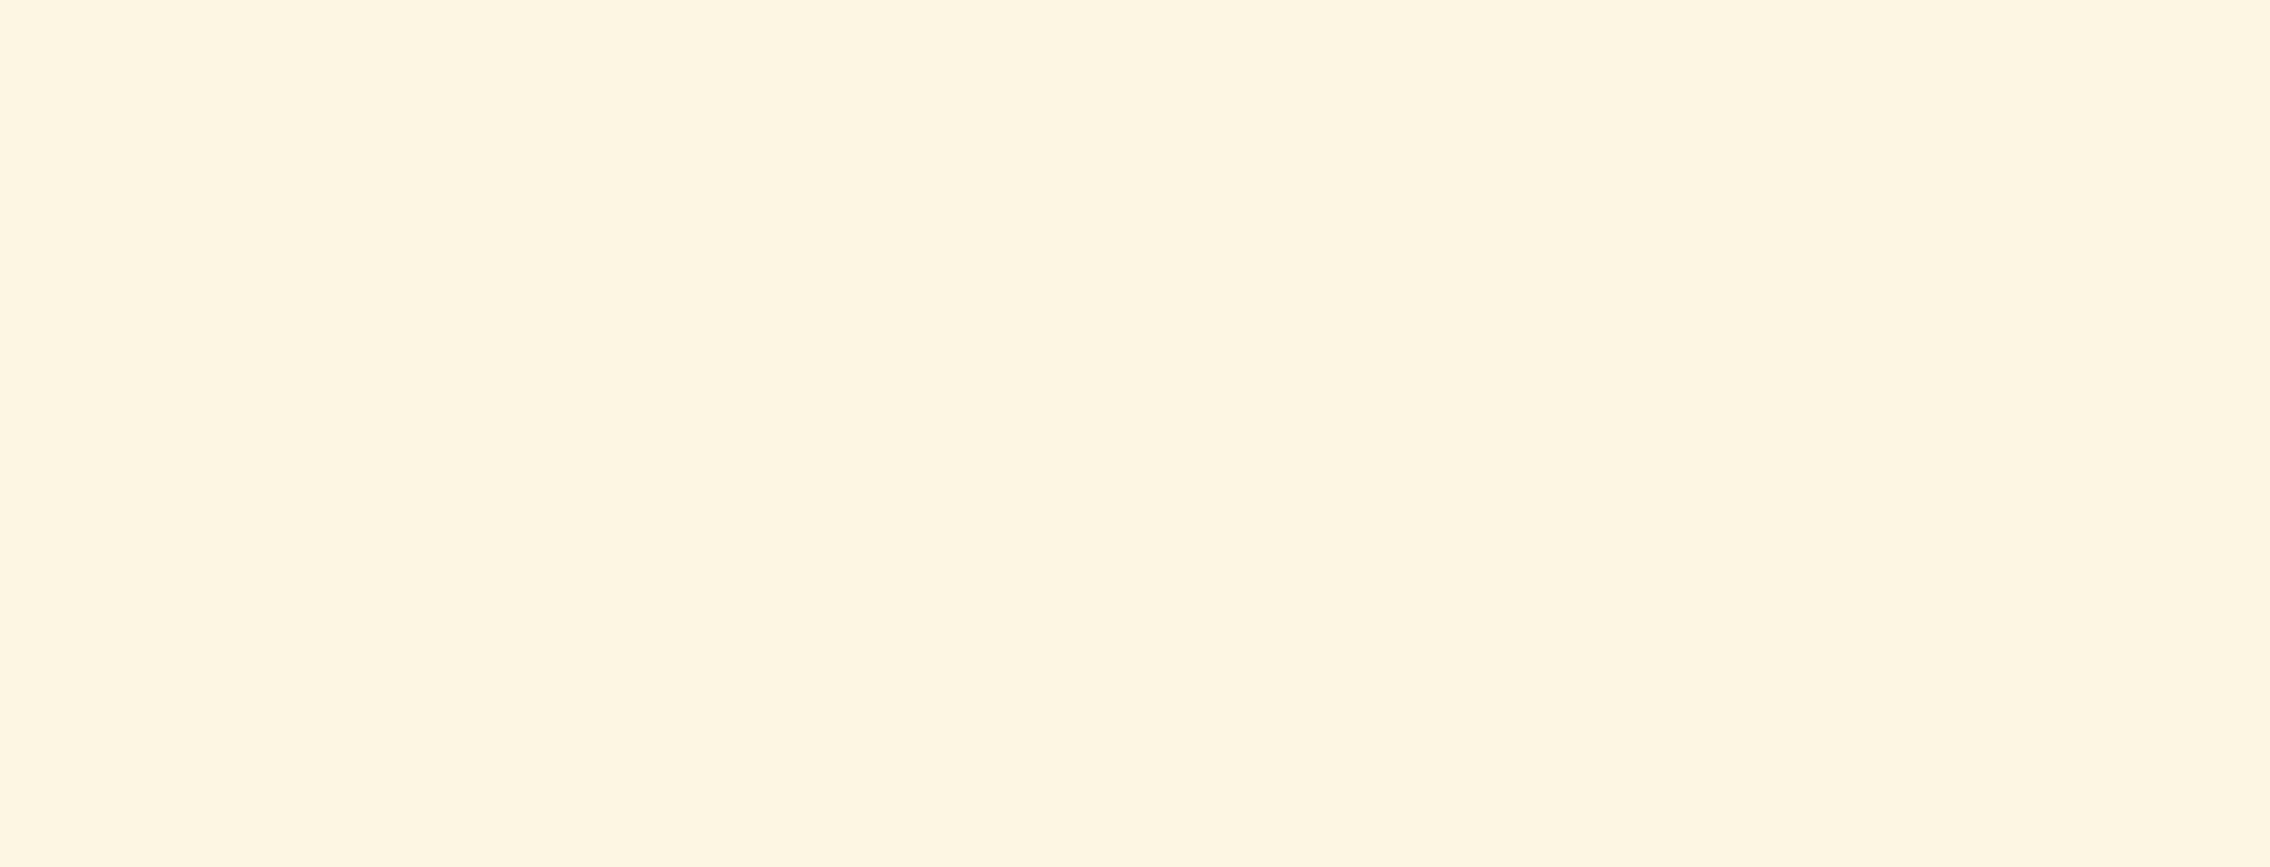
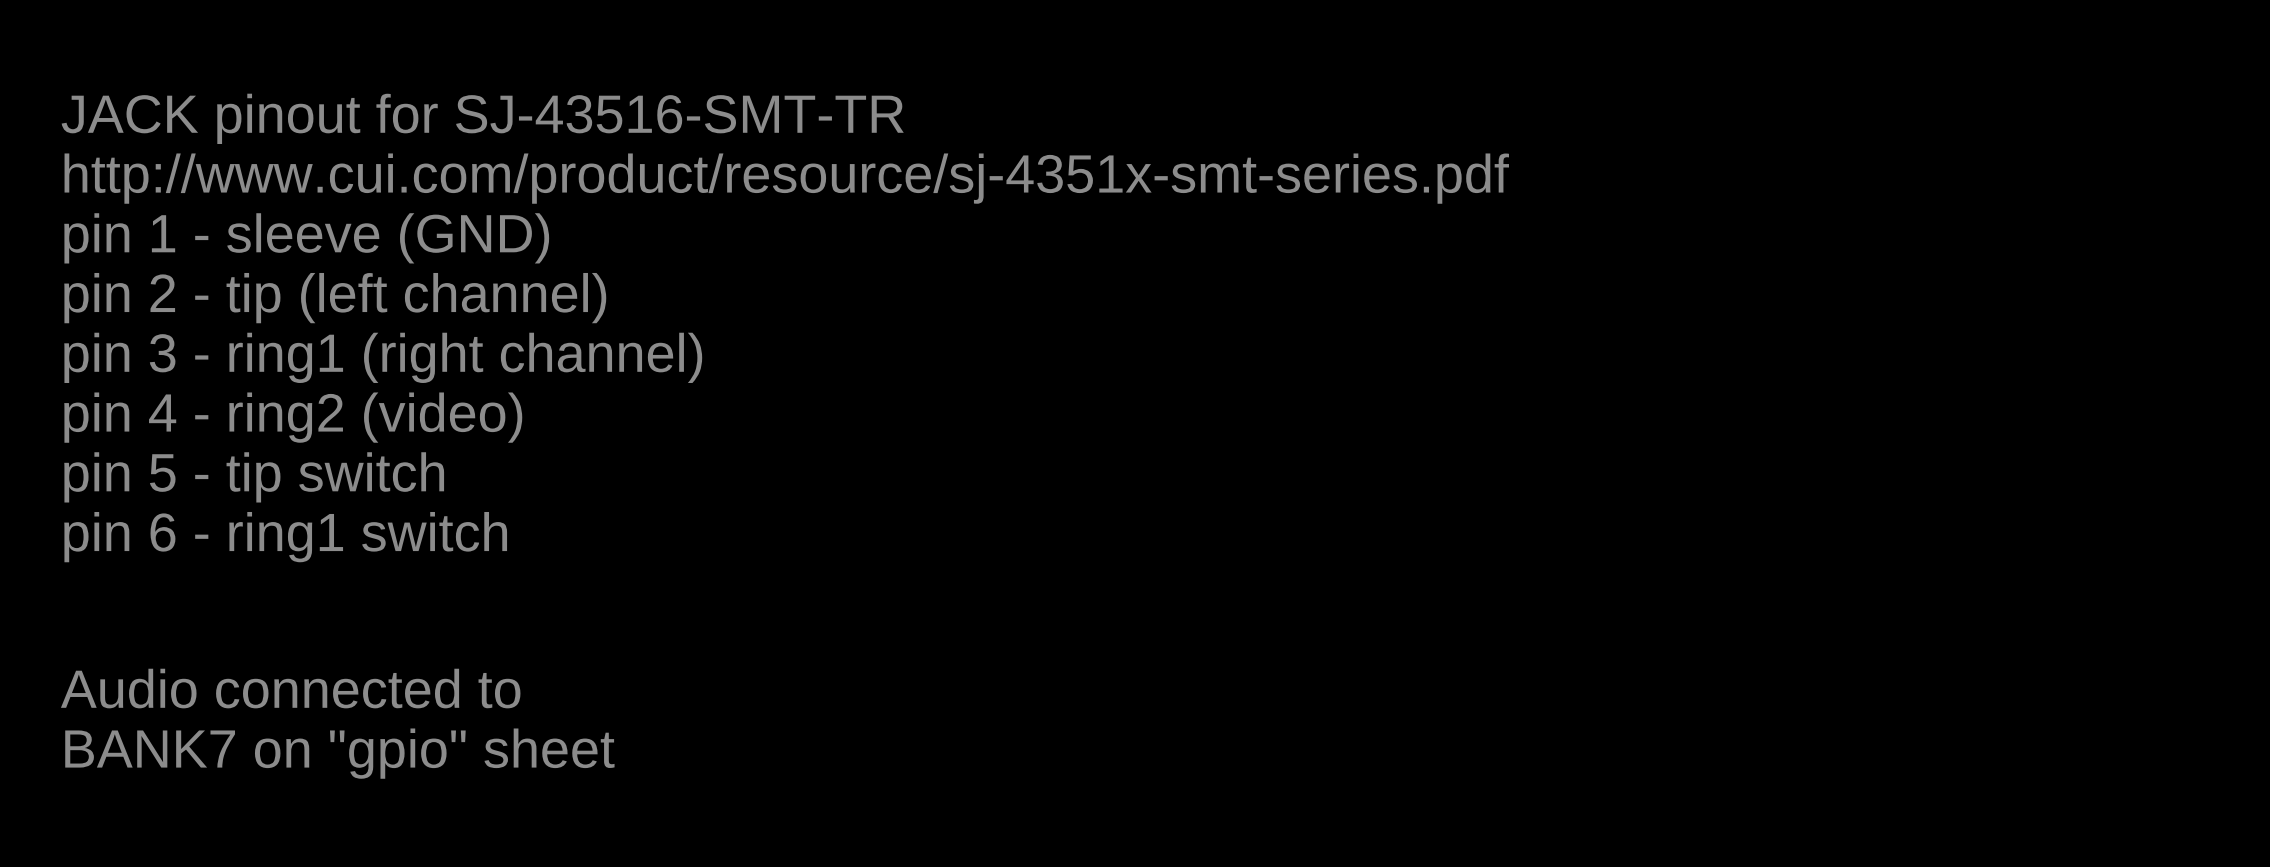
text: none -> JACK pinout for SJ-43516-SMT-TR (482, 118)
text: none -> http://www.cui.com/product/resource/sj-4351x-smt-series.pdf (786, 178)
text: none -> pin 1 - sleeve (GND) (306, 238)
text: none -> pin 2 - tip (left channel) (335, 298)
text: none -> pin 3 - ring1 (right channel) (383, 357)
text: none -> pin 4 - ring2 (video) (293, 417)
text: none -> pin 5 - tip switch (254, 477)
text: none -> pin 6 - ring1 switch (285, 537)
text: none -> Audio connected to (290, 688)
text: none -> BANK7 on "gpio" sheet (339, 753)

